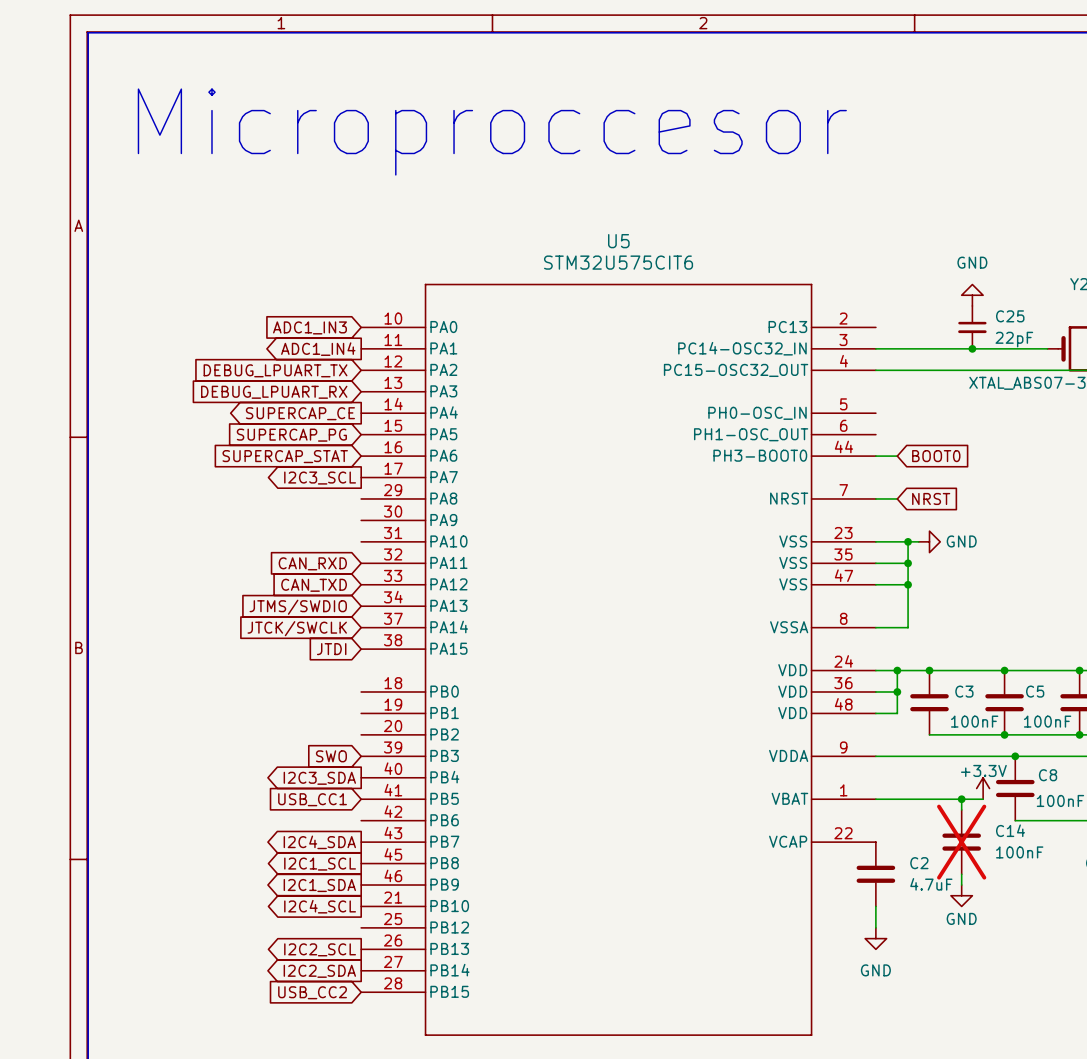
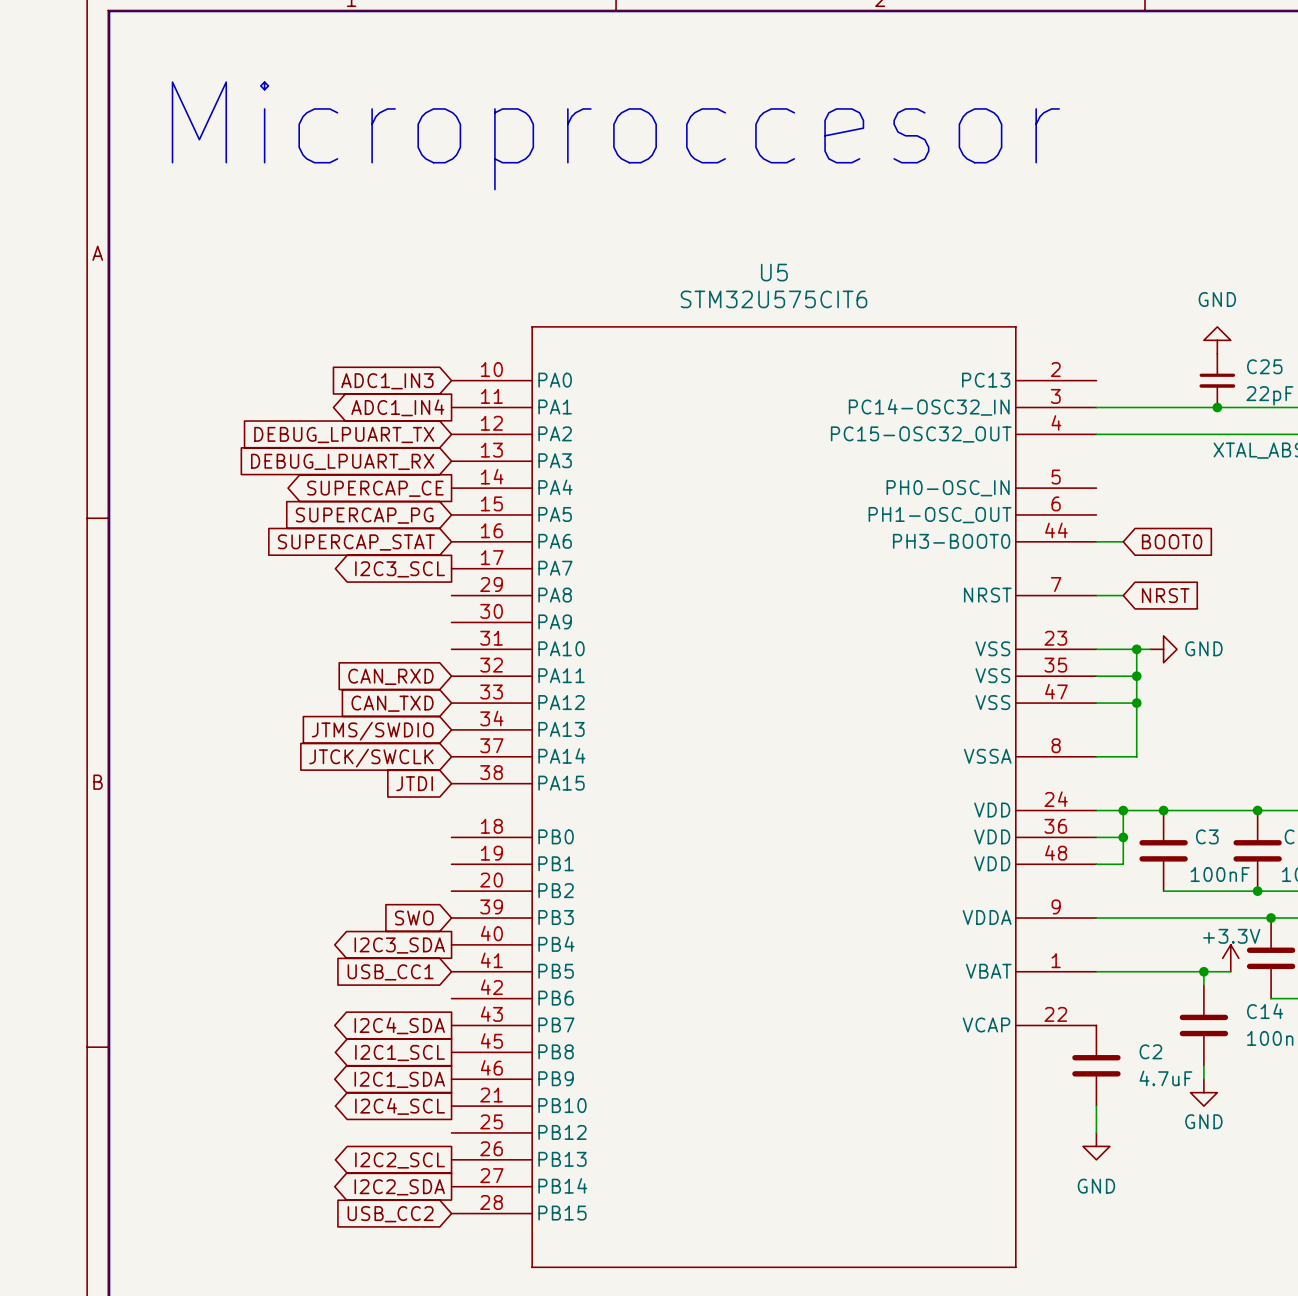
C14 do-not-place cross: (961, 842) -> none

